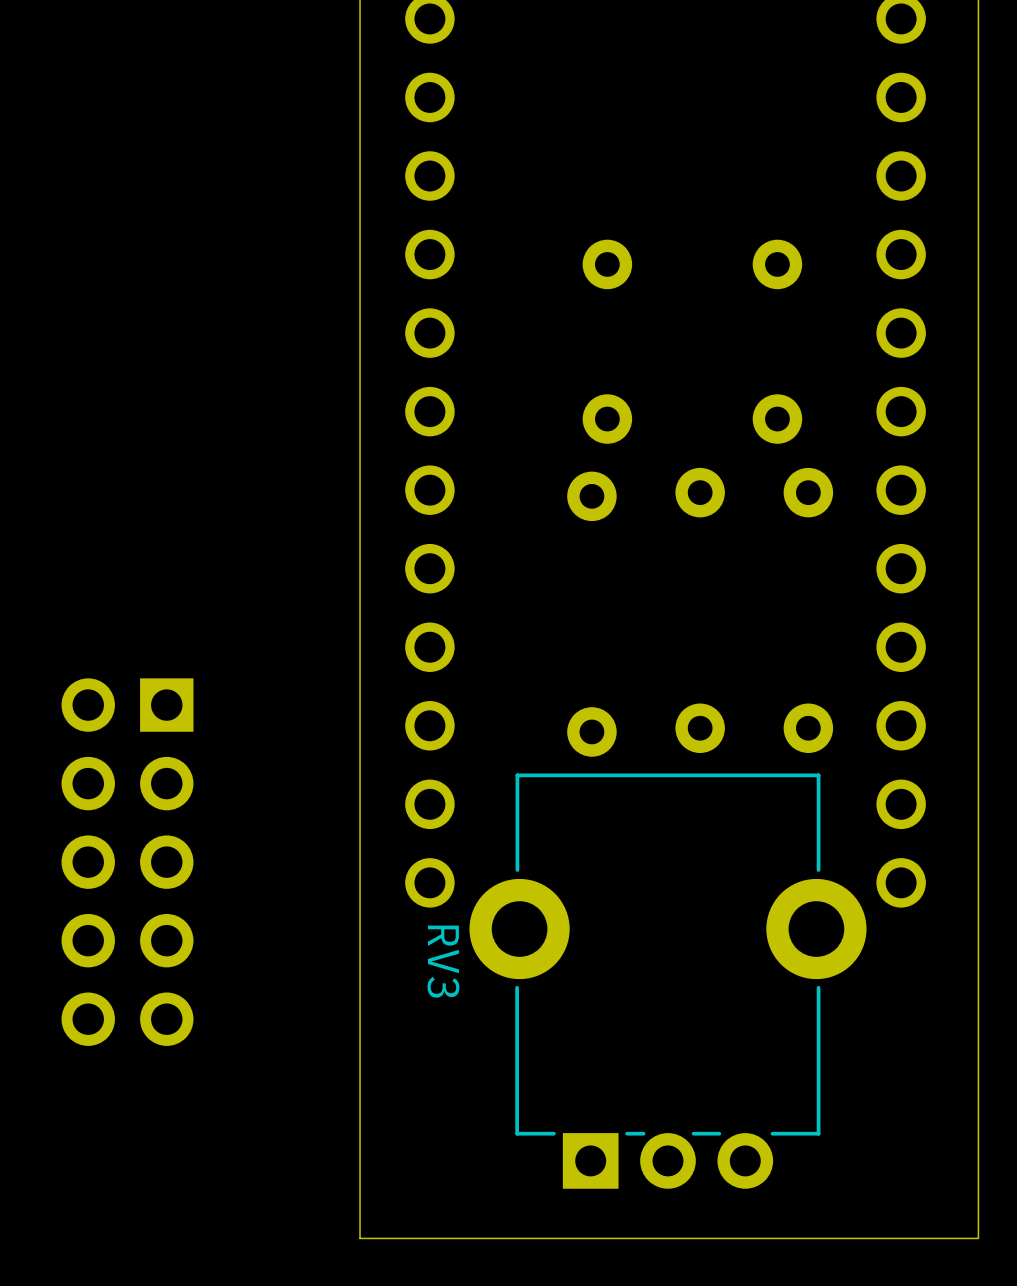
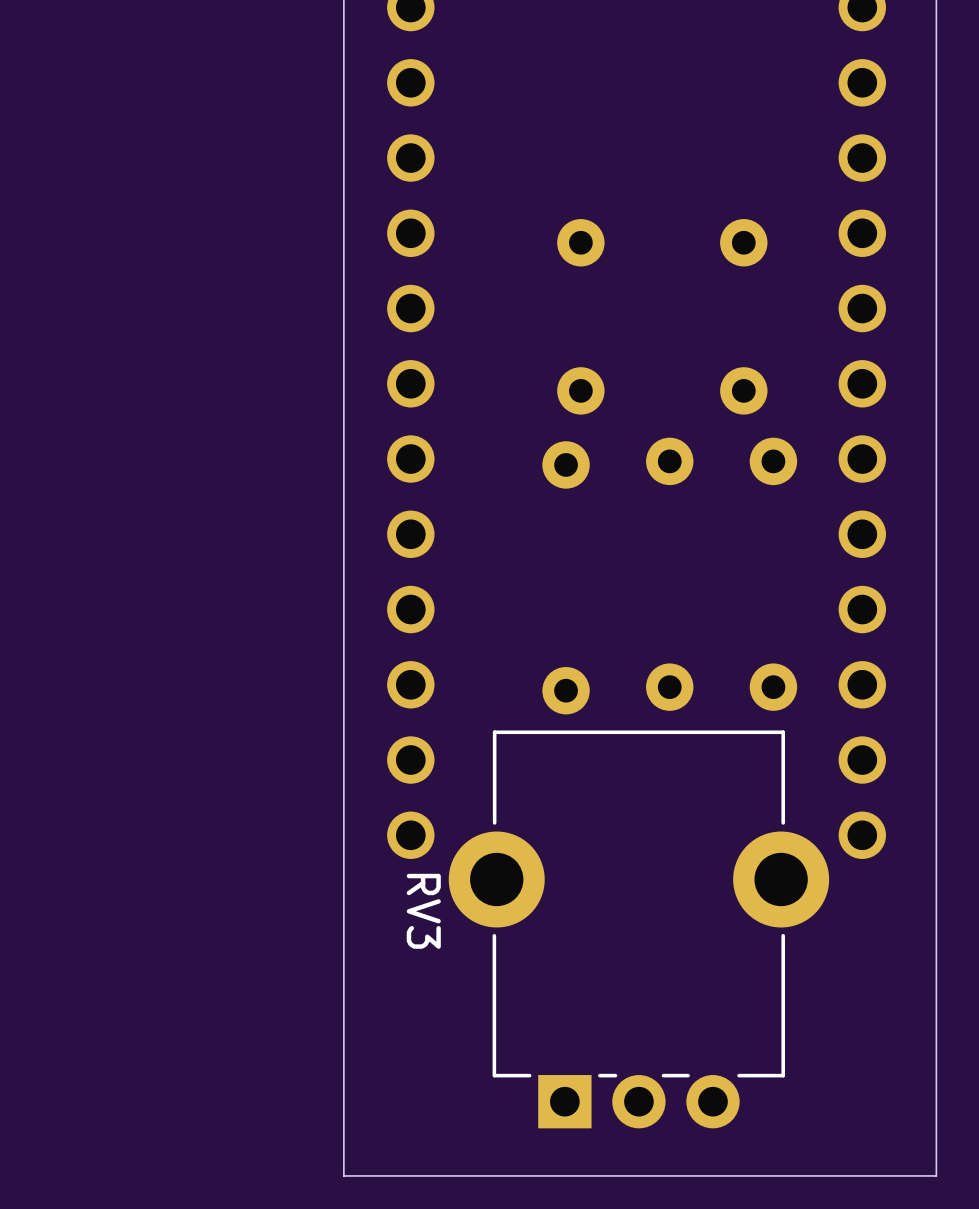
part: (127, 862) -> none

